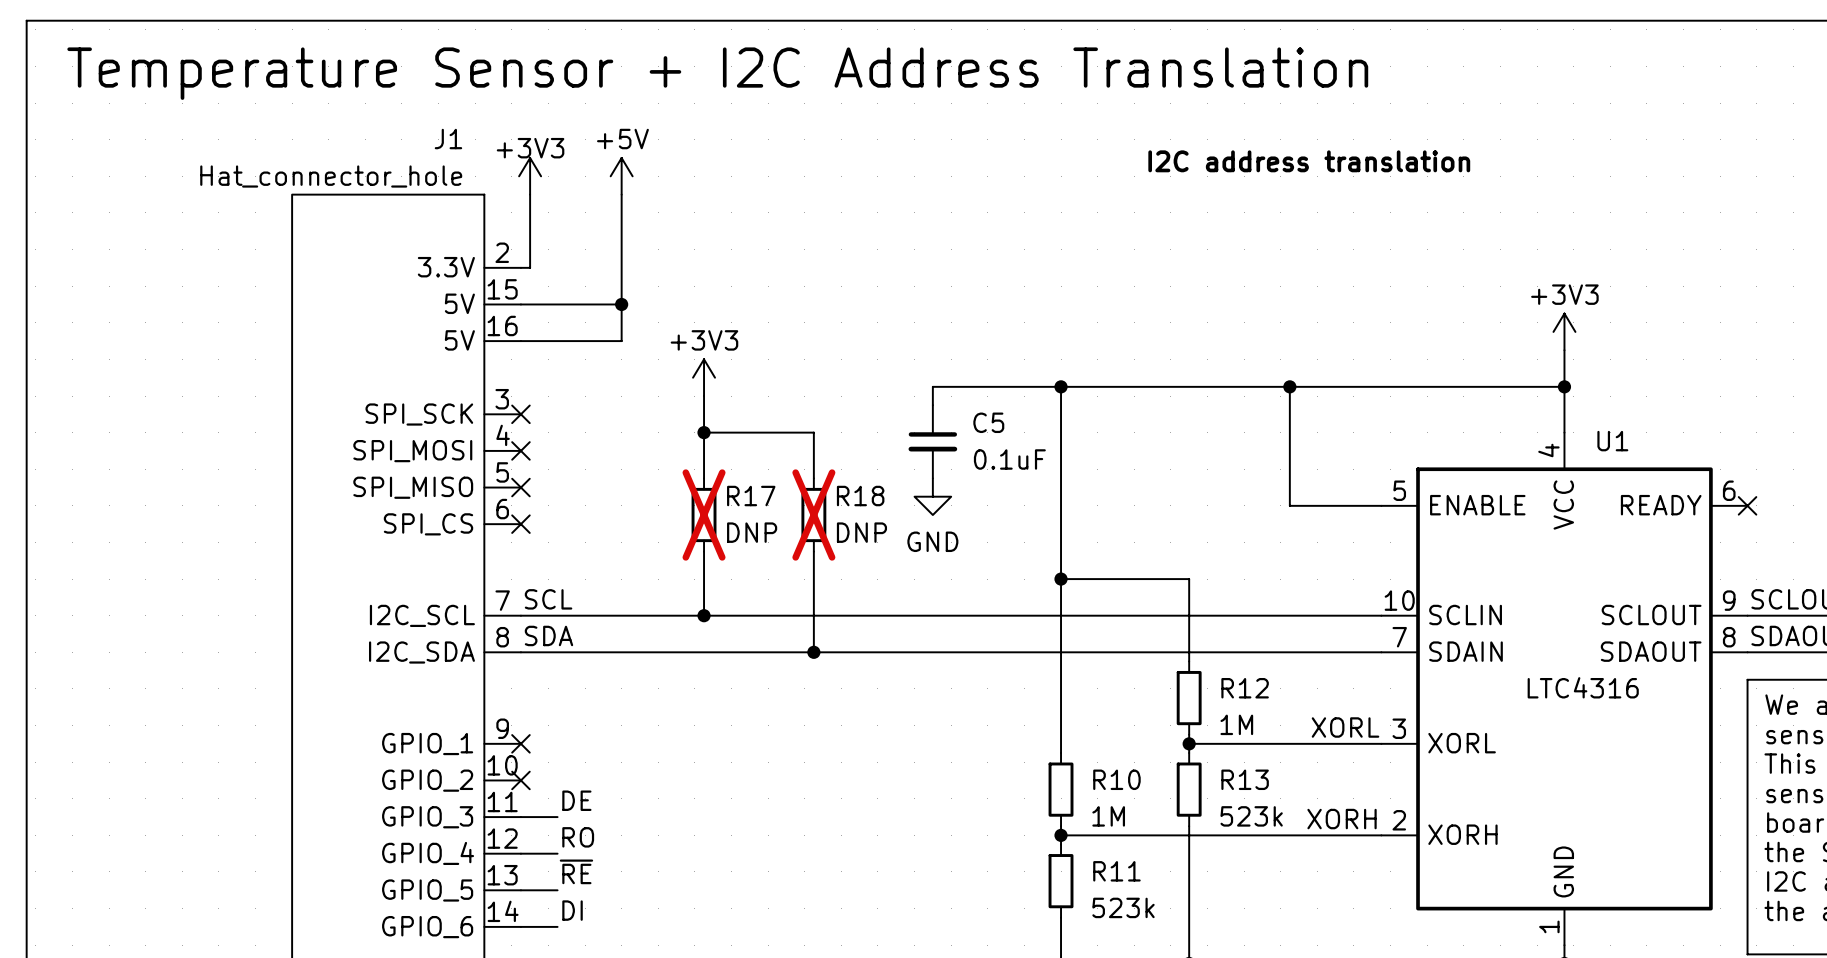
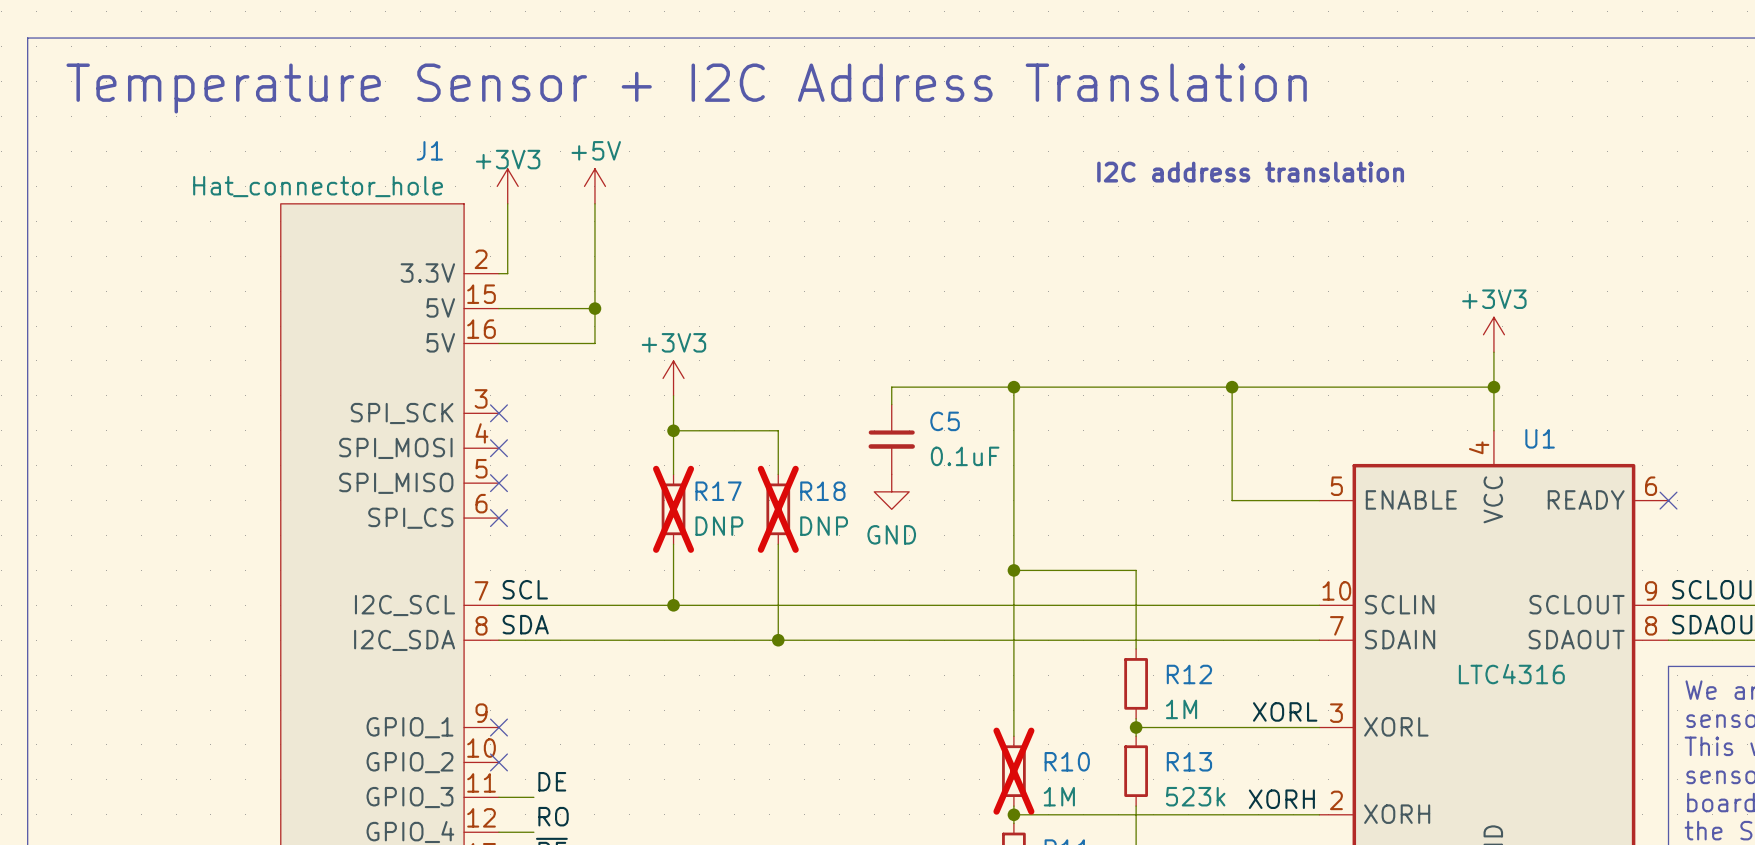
R10 do-not-place cross: none -> (1013, 771)

